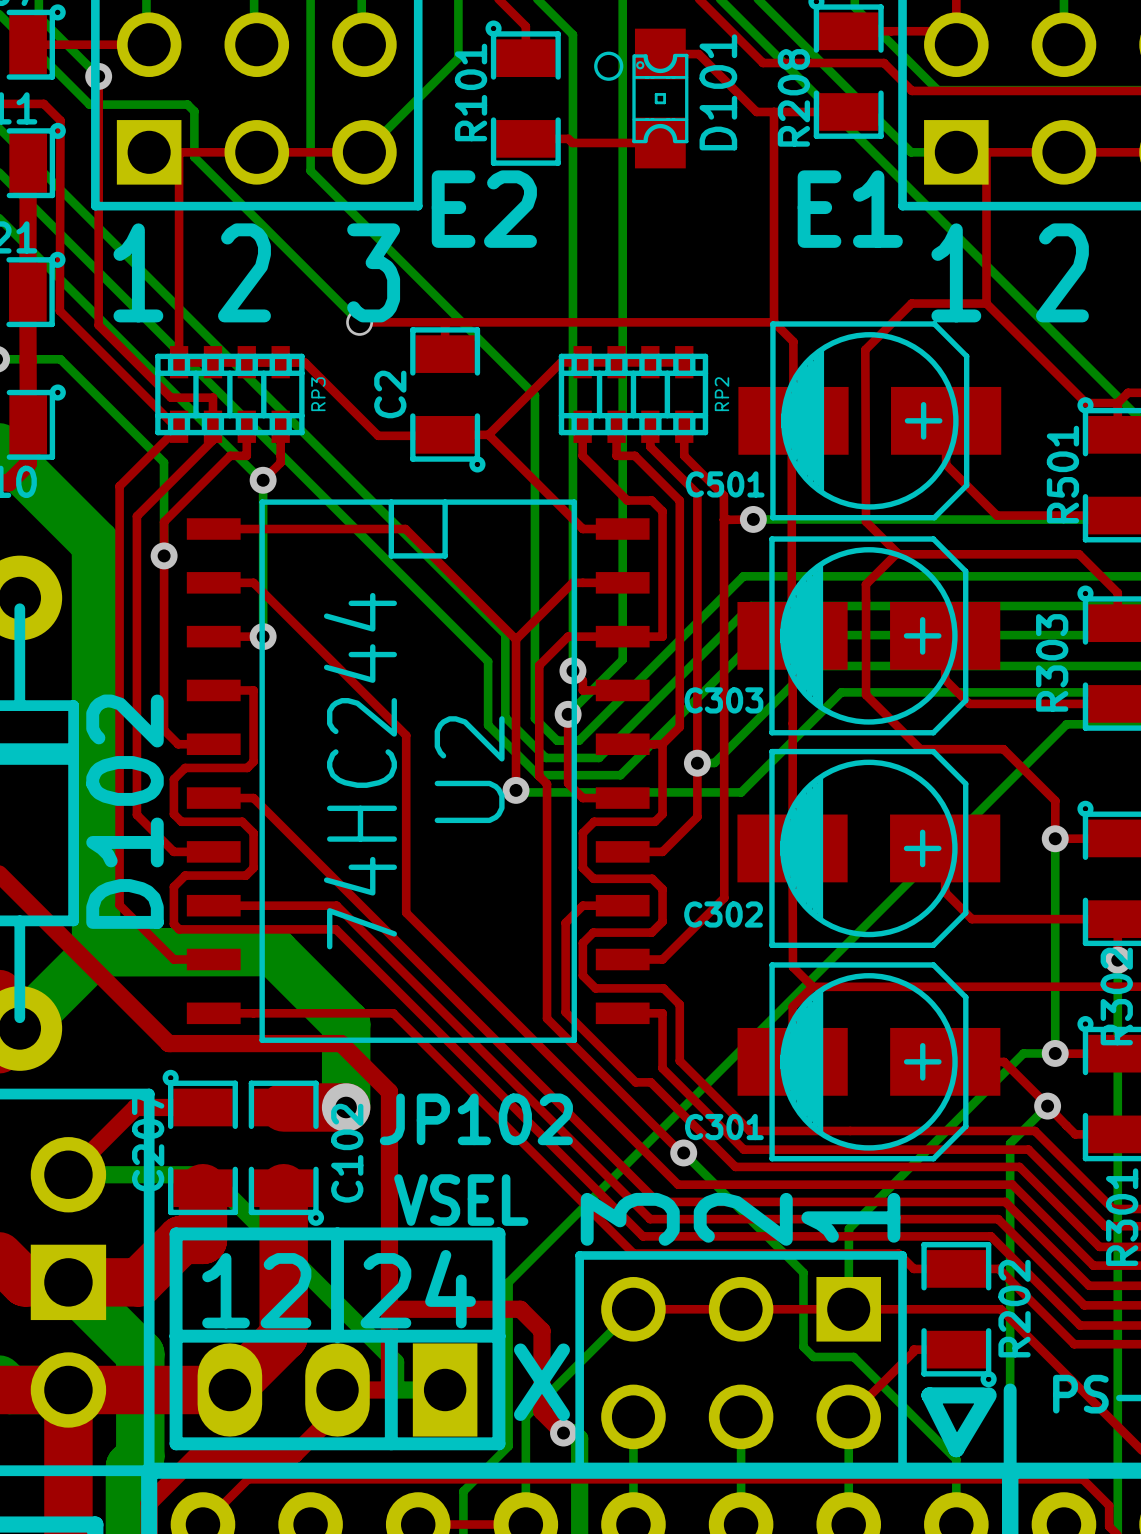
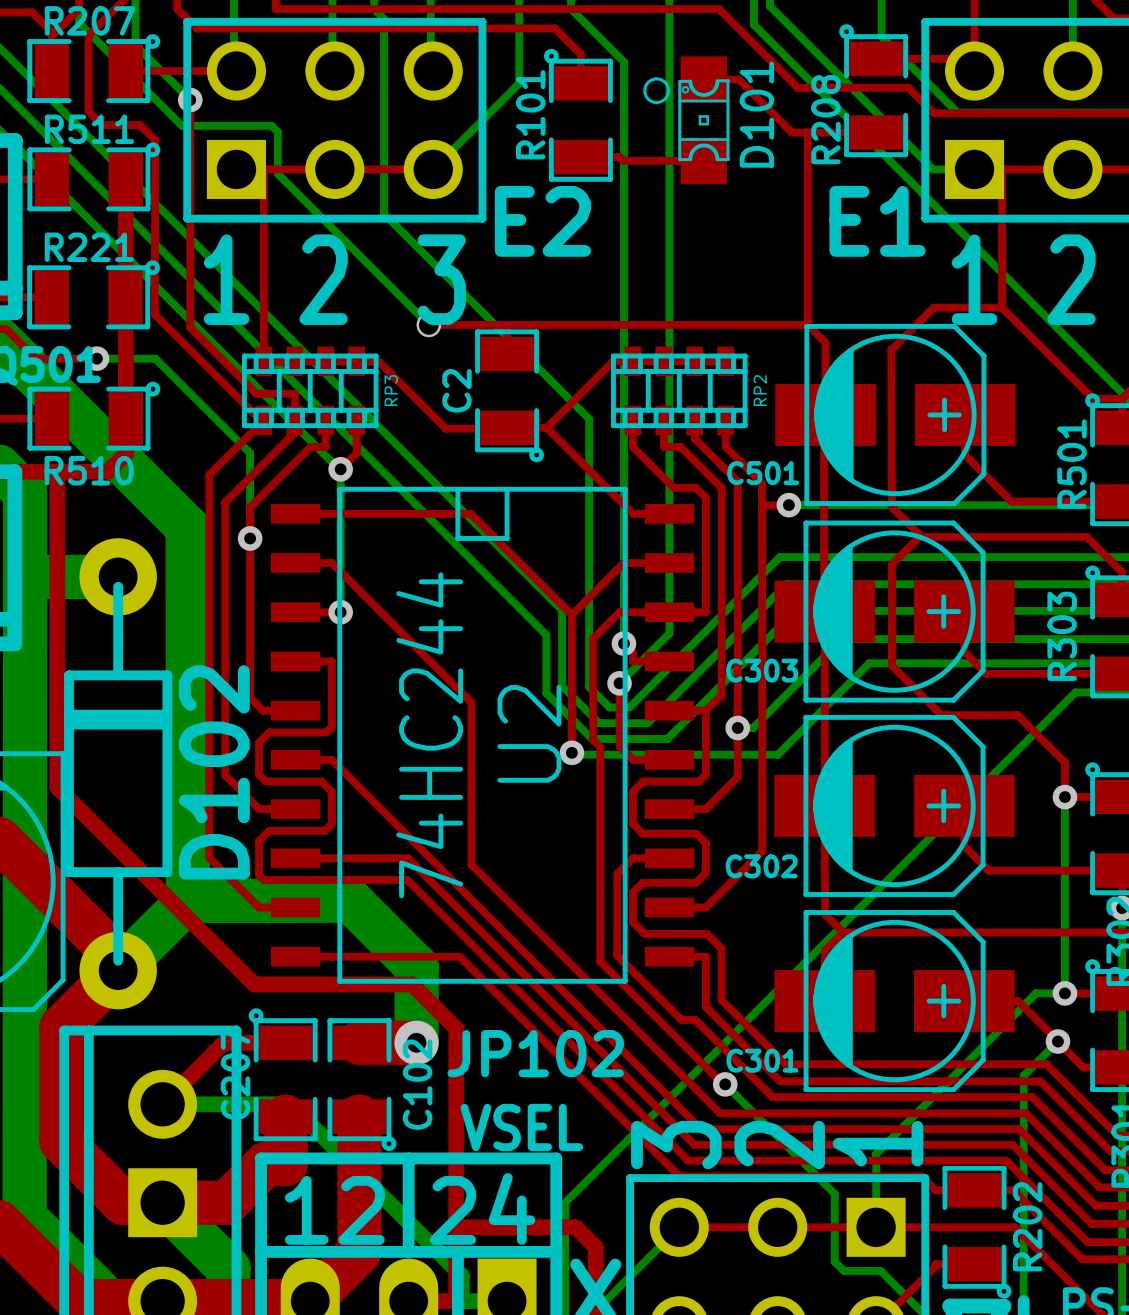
bottom track: (310, 170) (534, 395) (534, 425) -> (384, 186) (384, 213) (589, 419)

